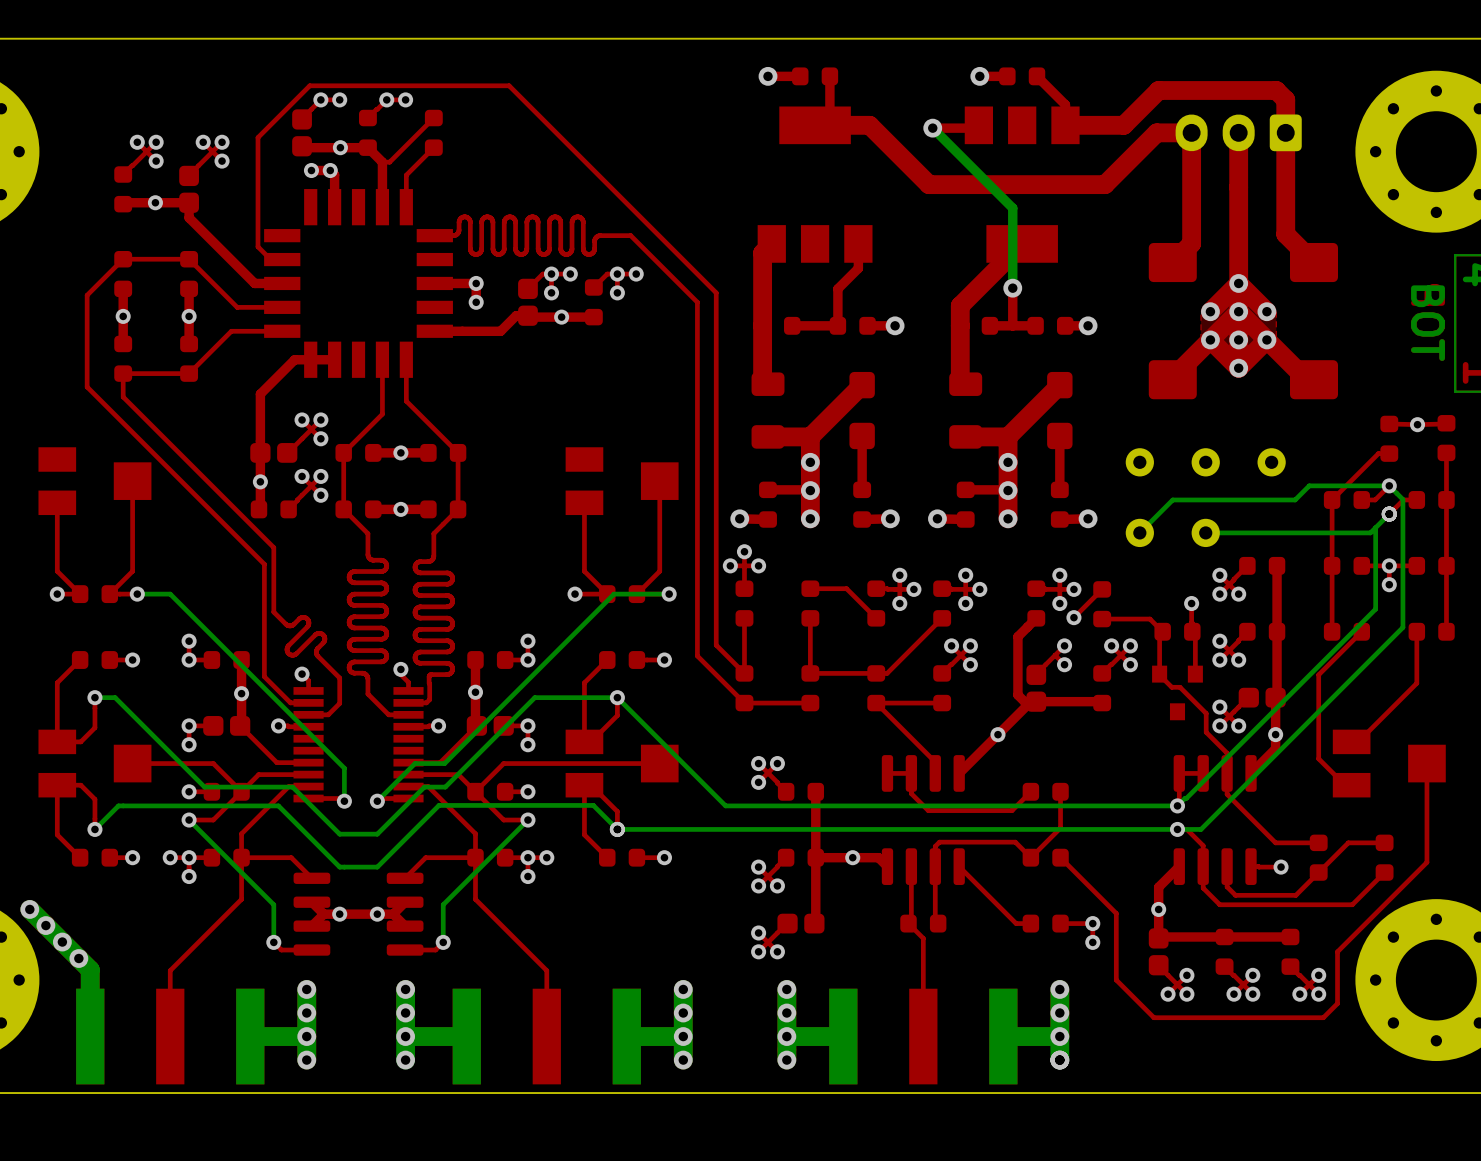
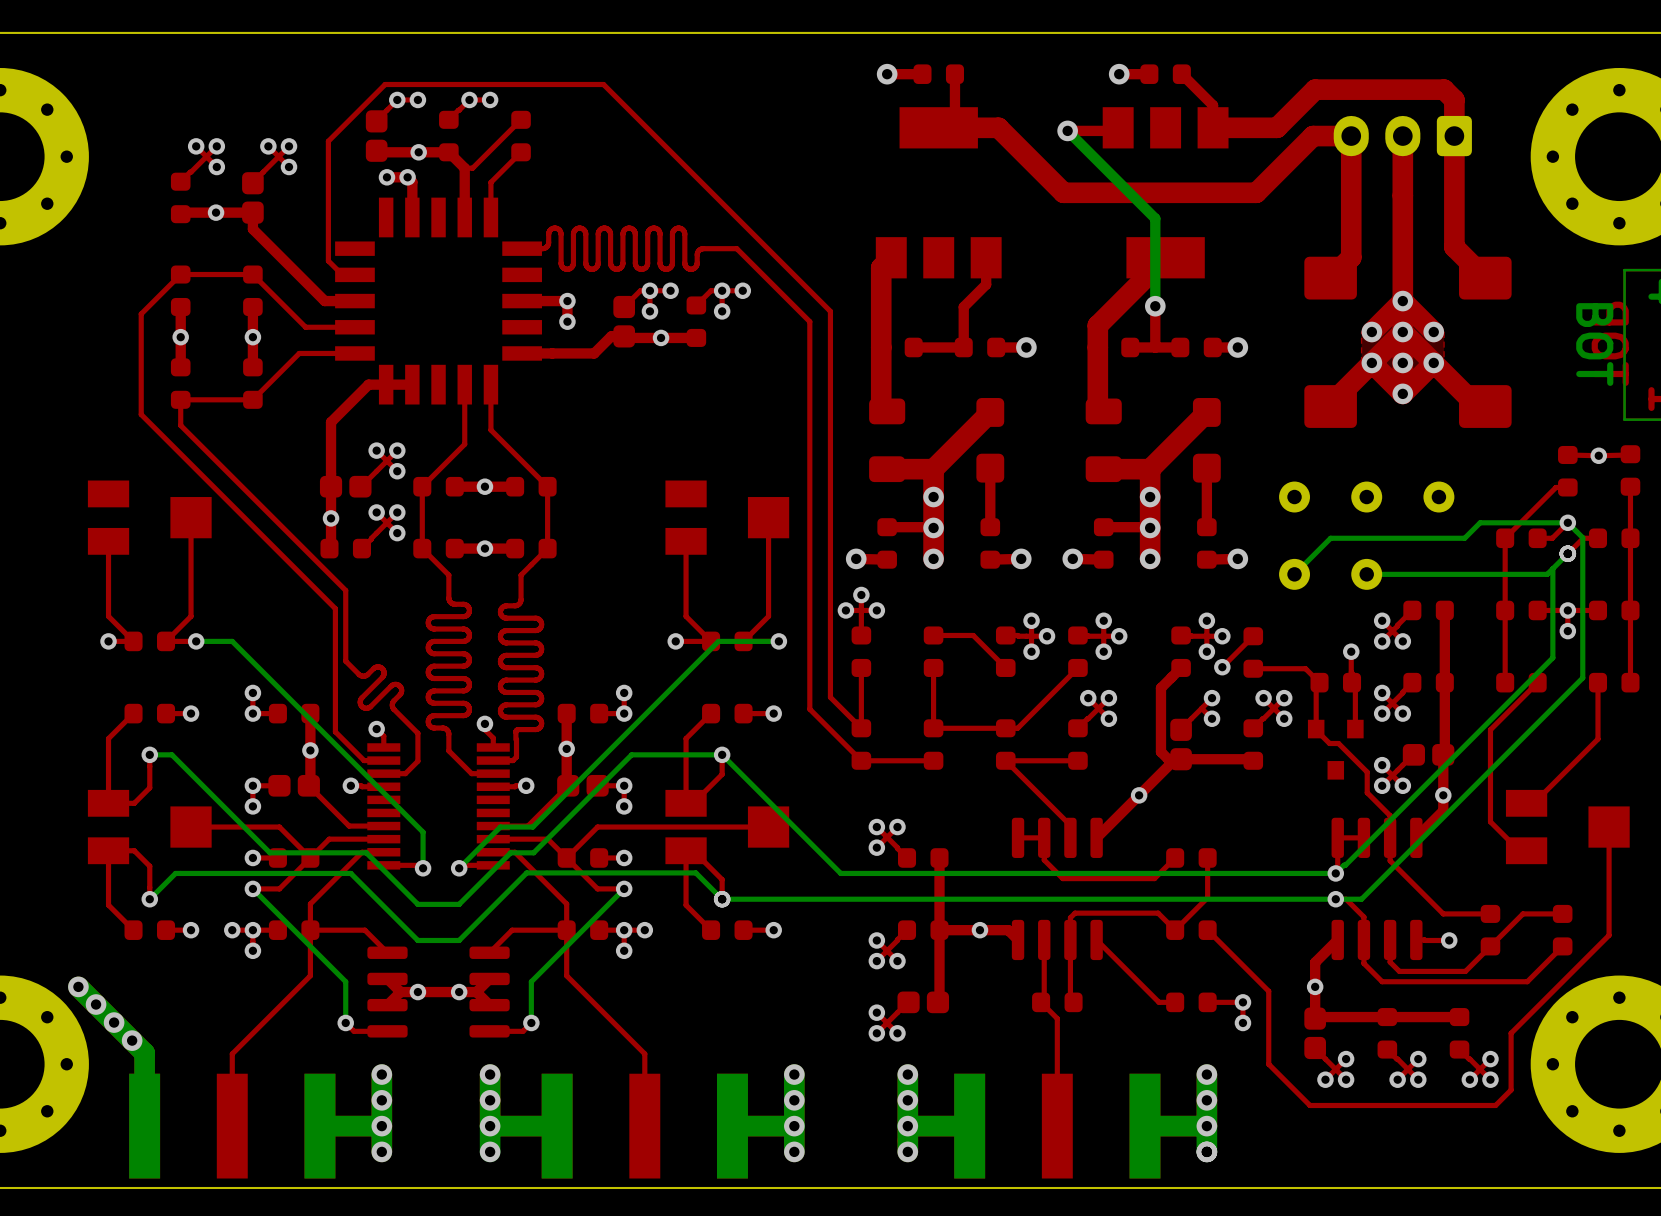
bottom track: (1455, 255) (1455, 391) -> (1640, 270) (1624, 270) (1624, 419) (1640, 419)
text position: BOT (1428, 323) -> BOT (1594, 344)

